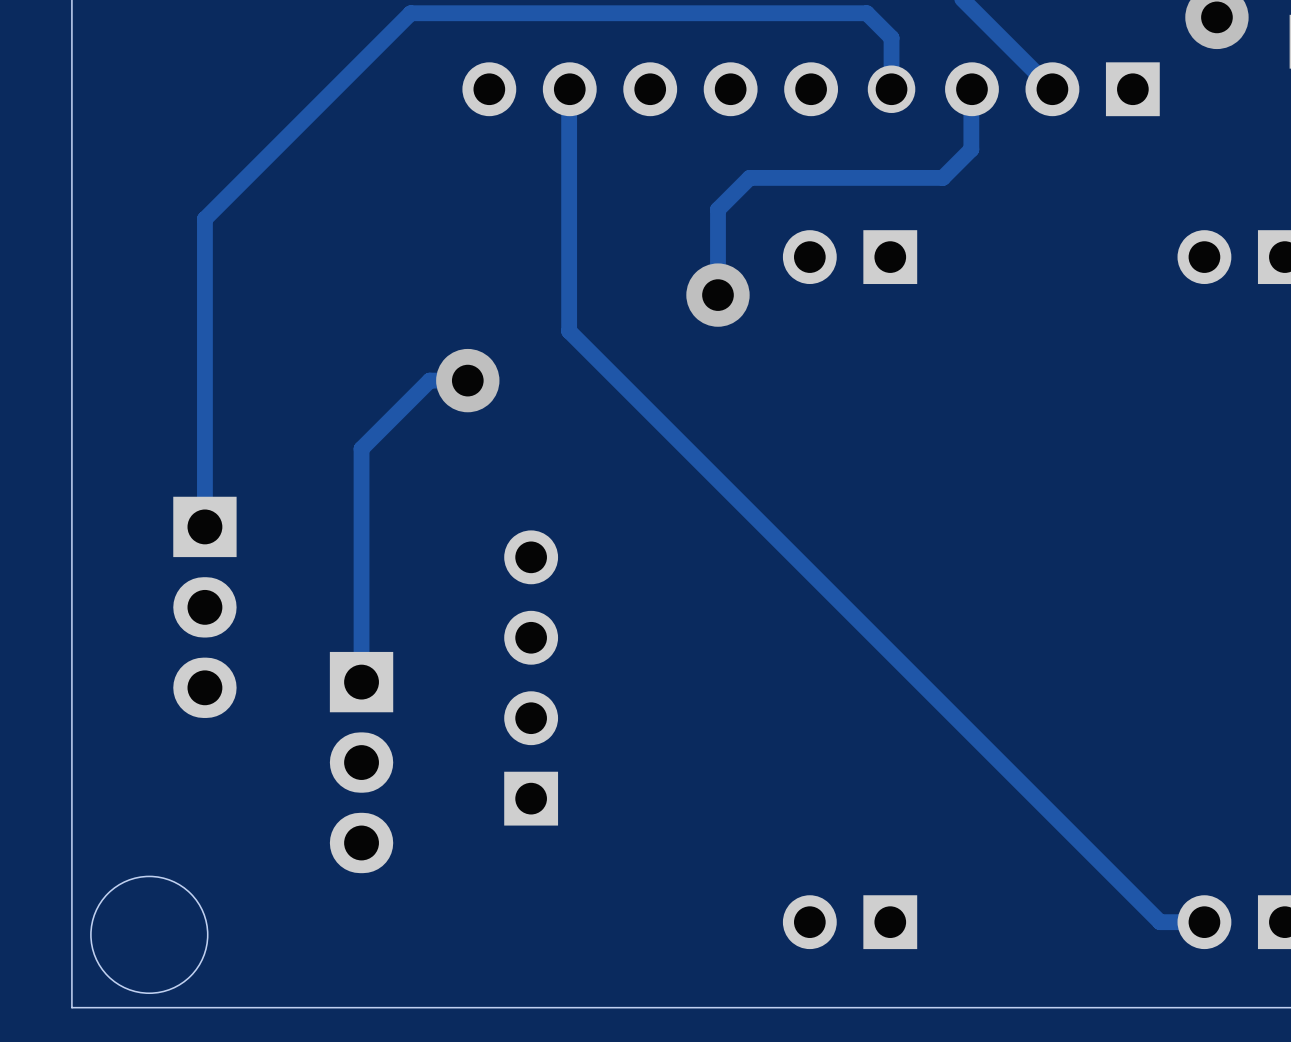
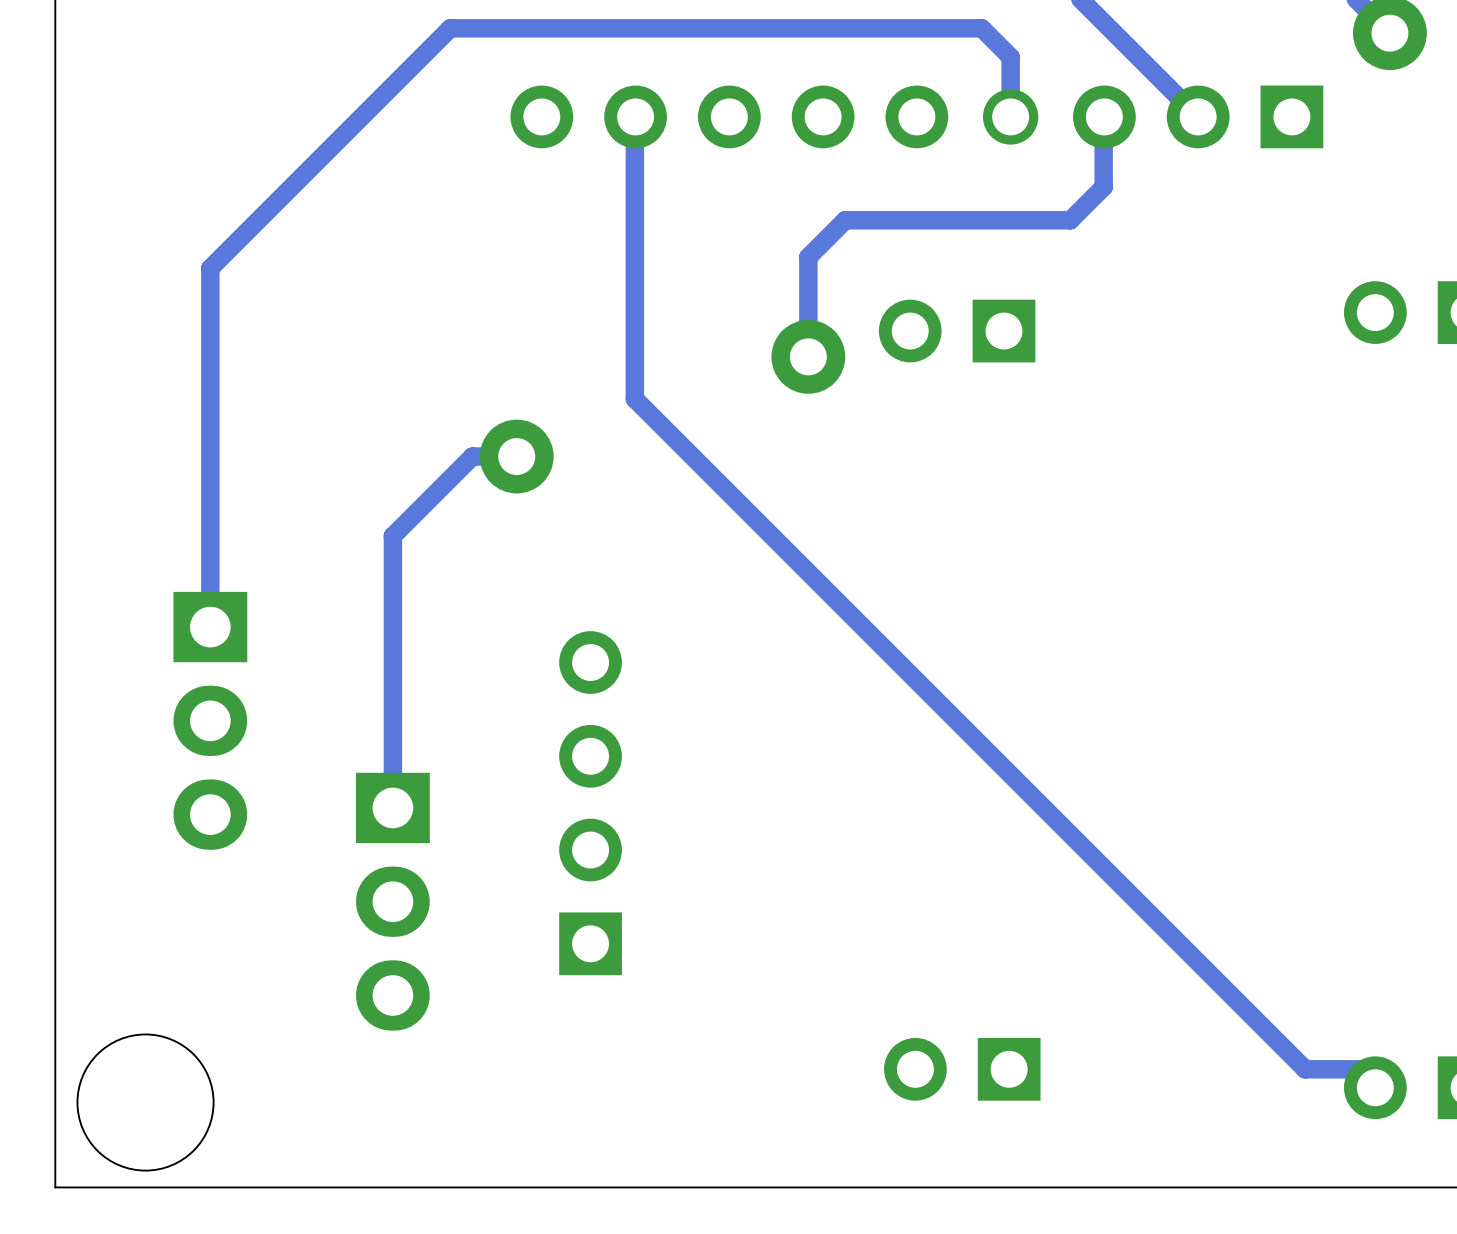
part position: (850, 257) -> (957, 331)
track: (1144, 906) (1160, 922) (1204, 922) -> (1305, 1069) (1375, 1069)
part position: (850, 922) -> (962, 1069)

